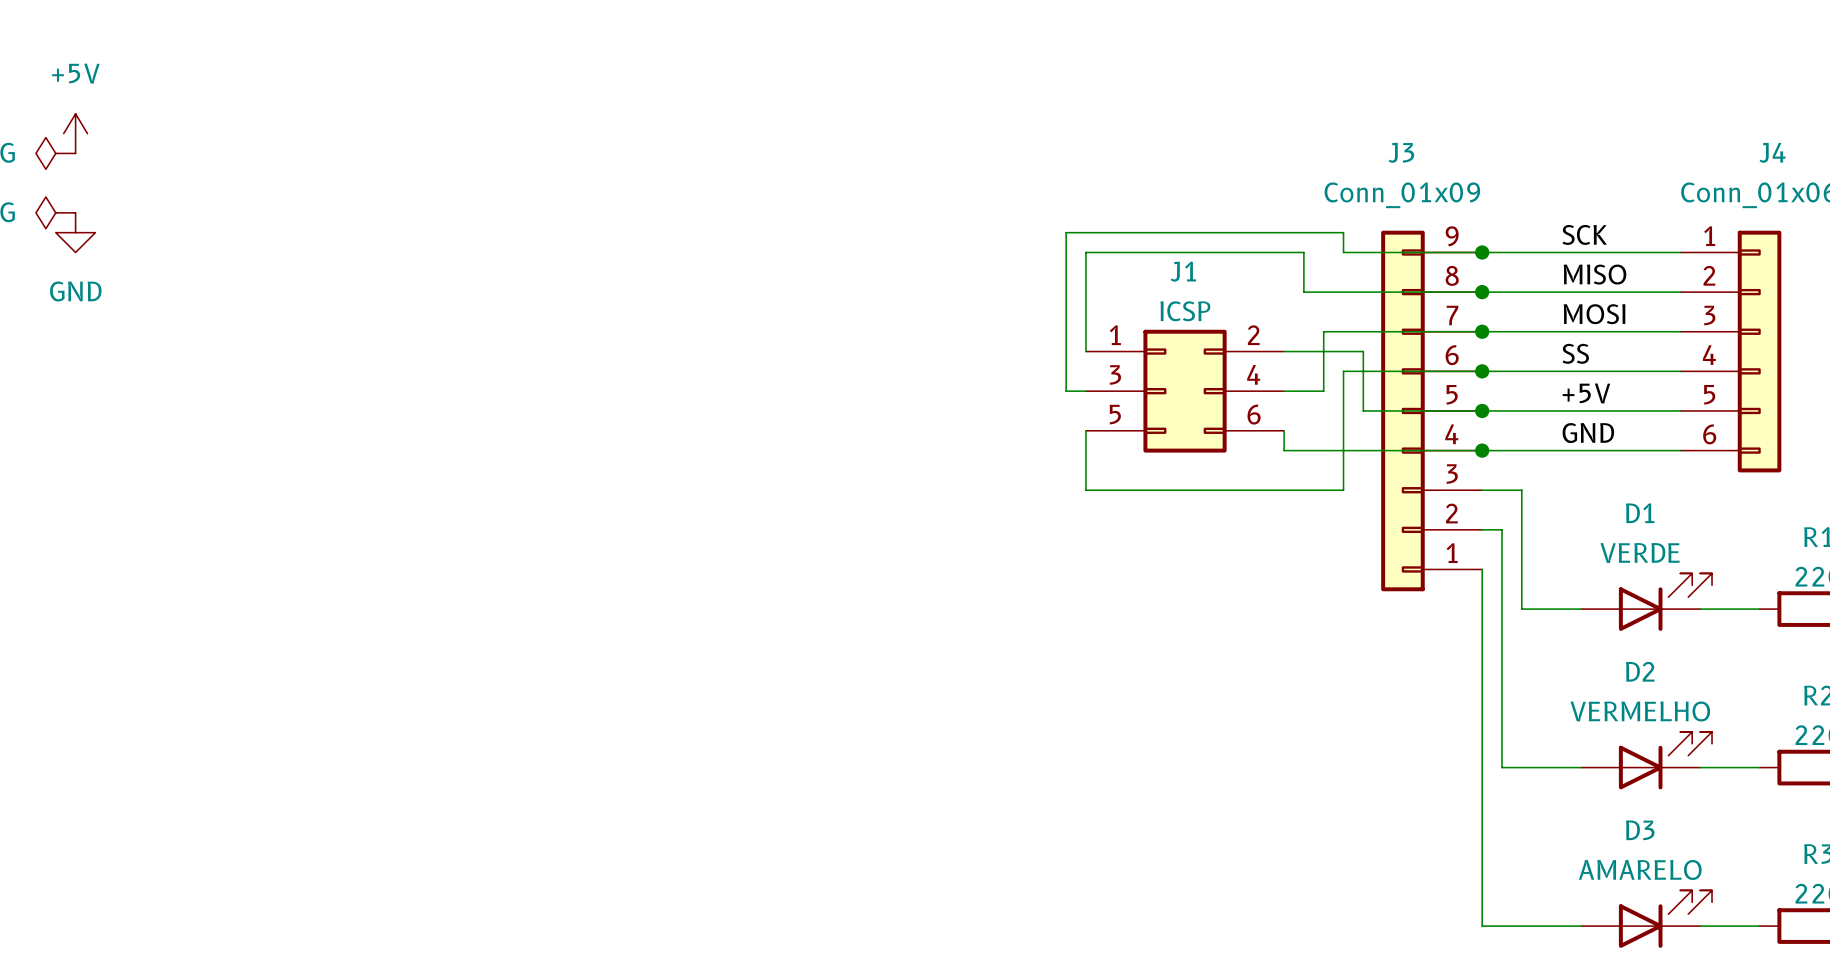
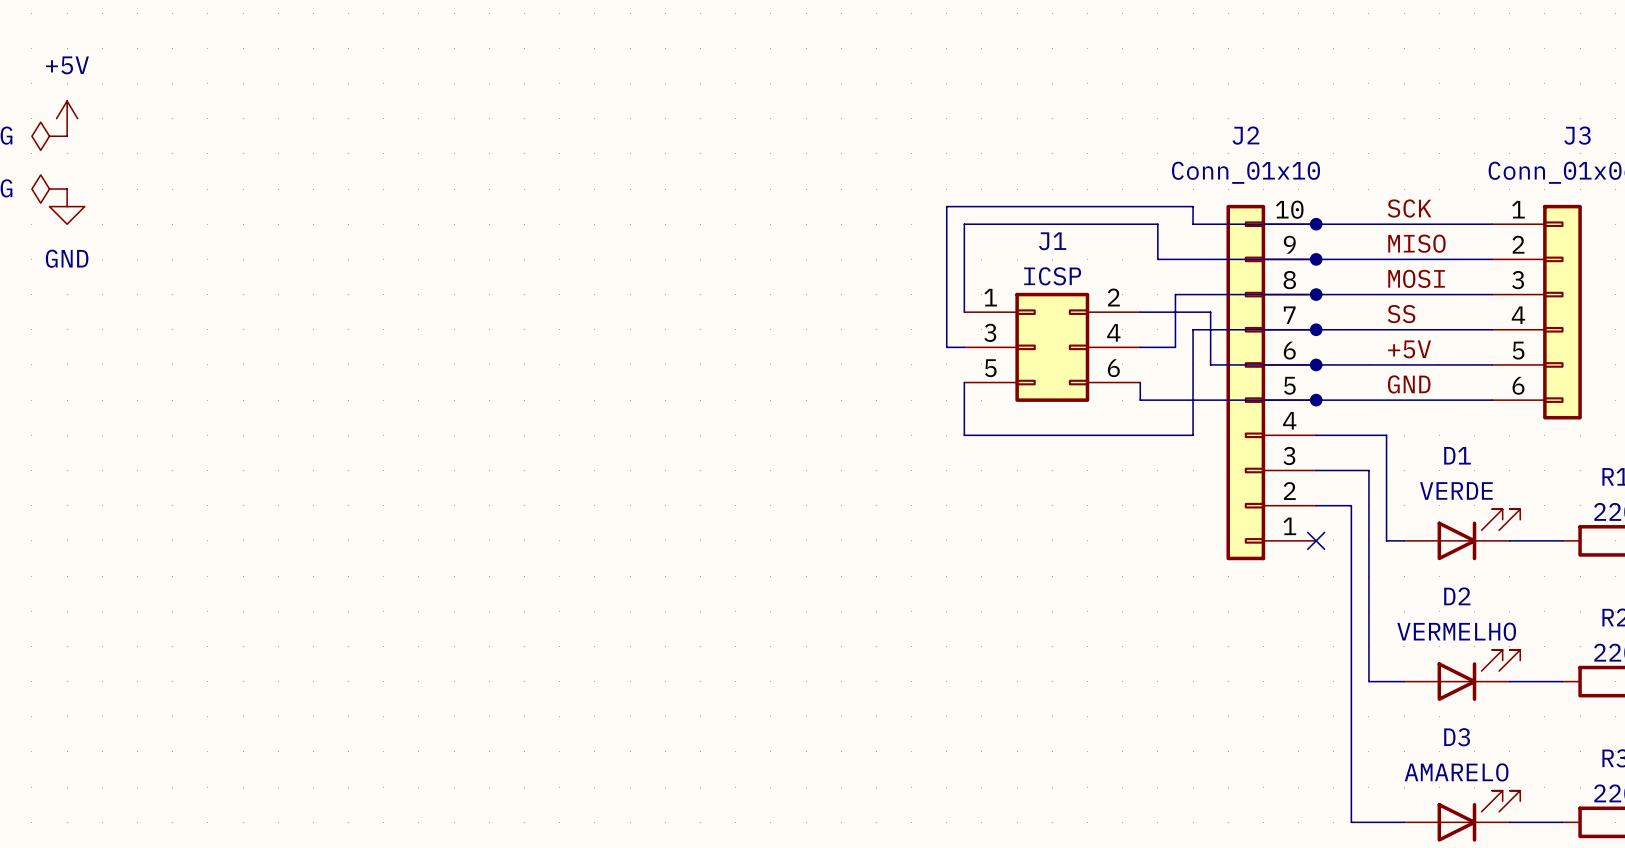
J4 name: J4 (1772, 152) -> J3 (1577, 135)
J3: Conn_01x09 (1431, 410) -> none
J2: none -> Conn_01x10 (1271, 382)
wire: (1521, 490) (1521, 569) -> (1351, 435) (1386, 435) (1386, 540)
wire: (1502, 529) (1502, 767) (1541, 767) -> (1333, 470) (1368, 470) (1368, 681)
wire: (1482, 569) (1482, 926) (1521, 926) -> (1351, 540) (1351, 822)
no-connect mark: none -> (1316, 540)
wire: (1521, 609) (1561, 609) -> (1316, 505) (1351, 505)

